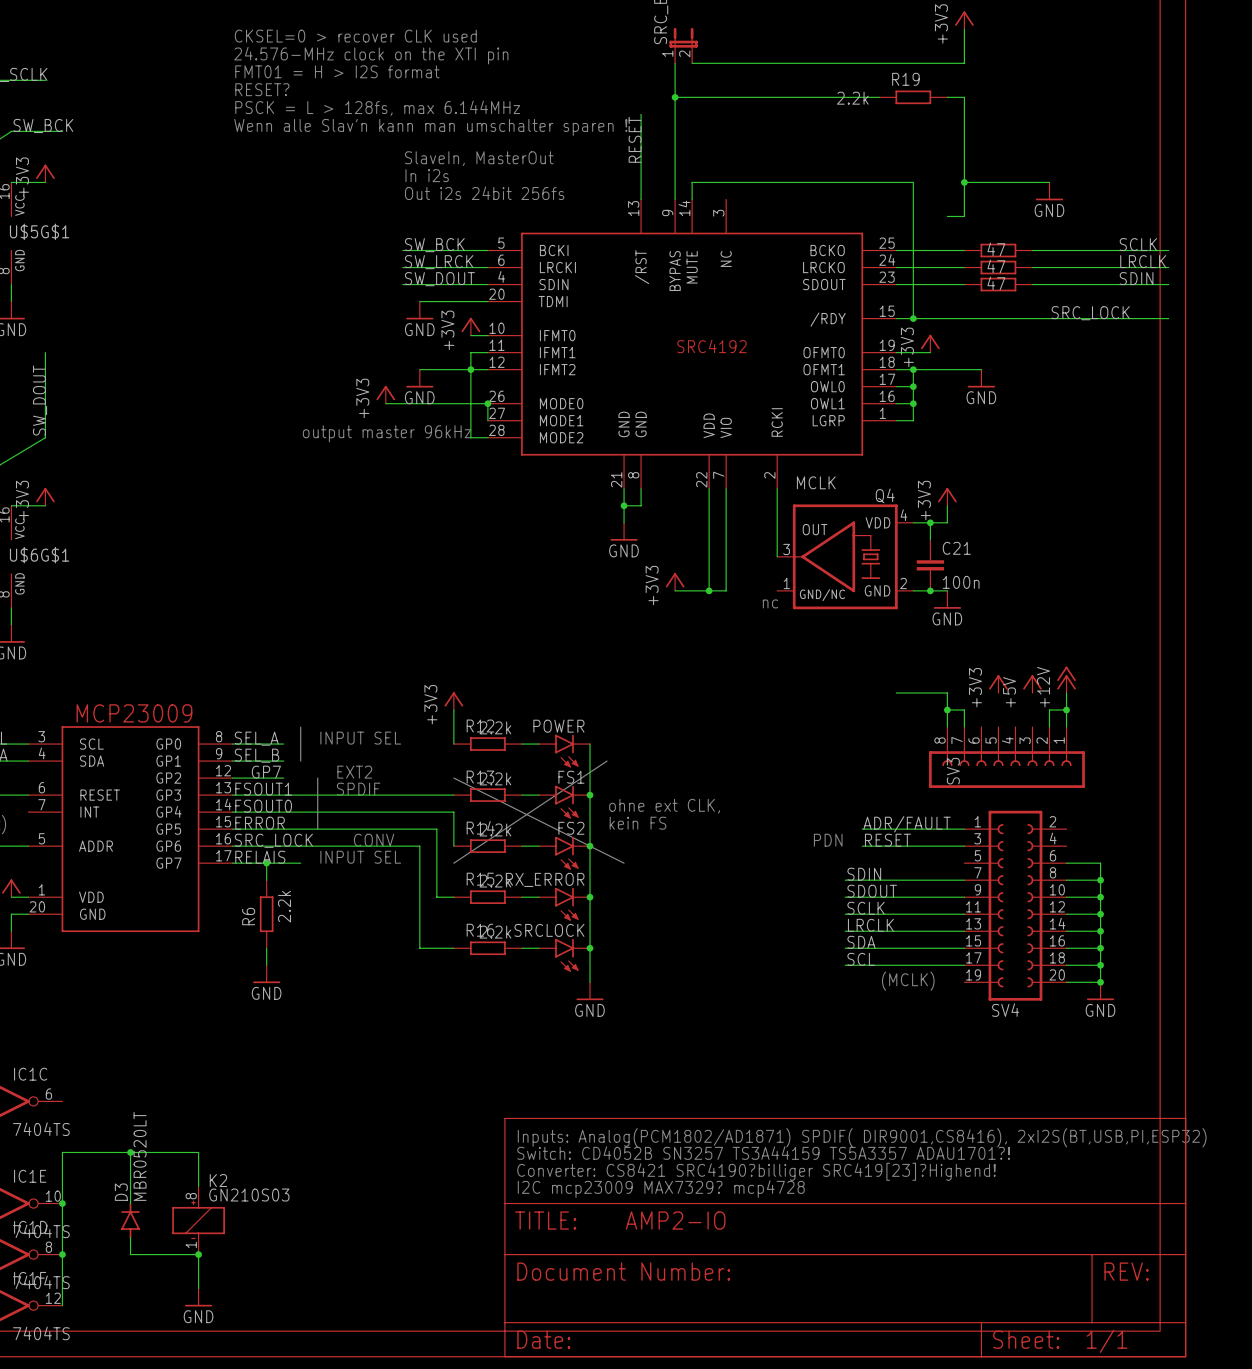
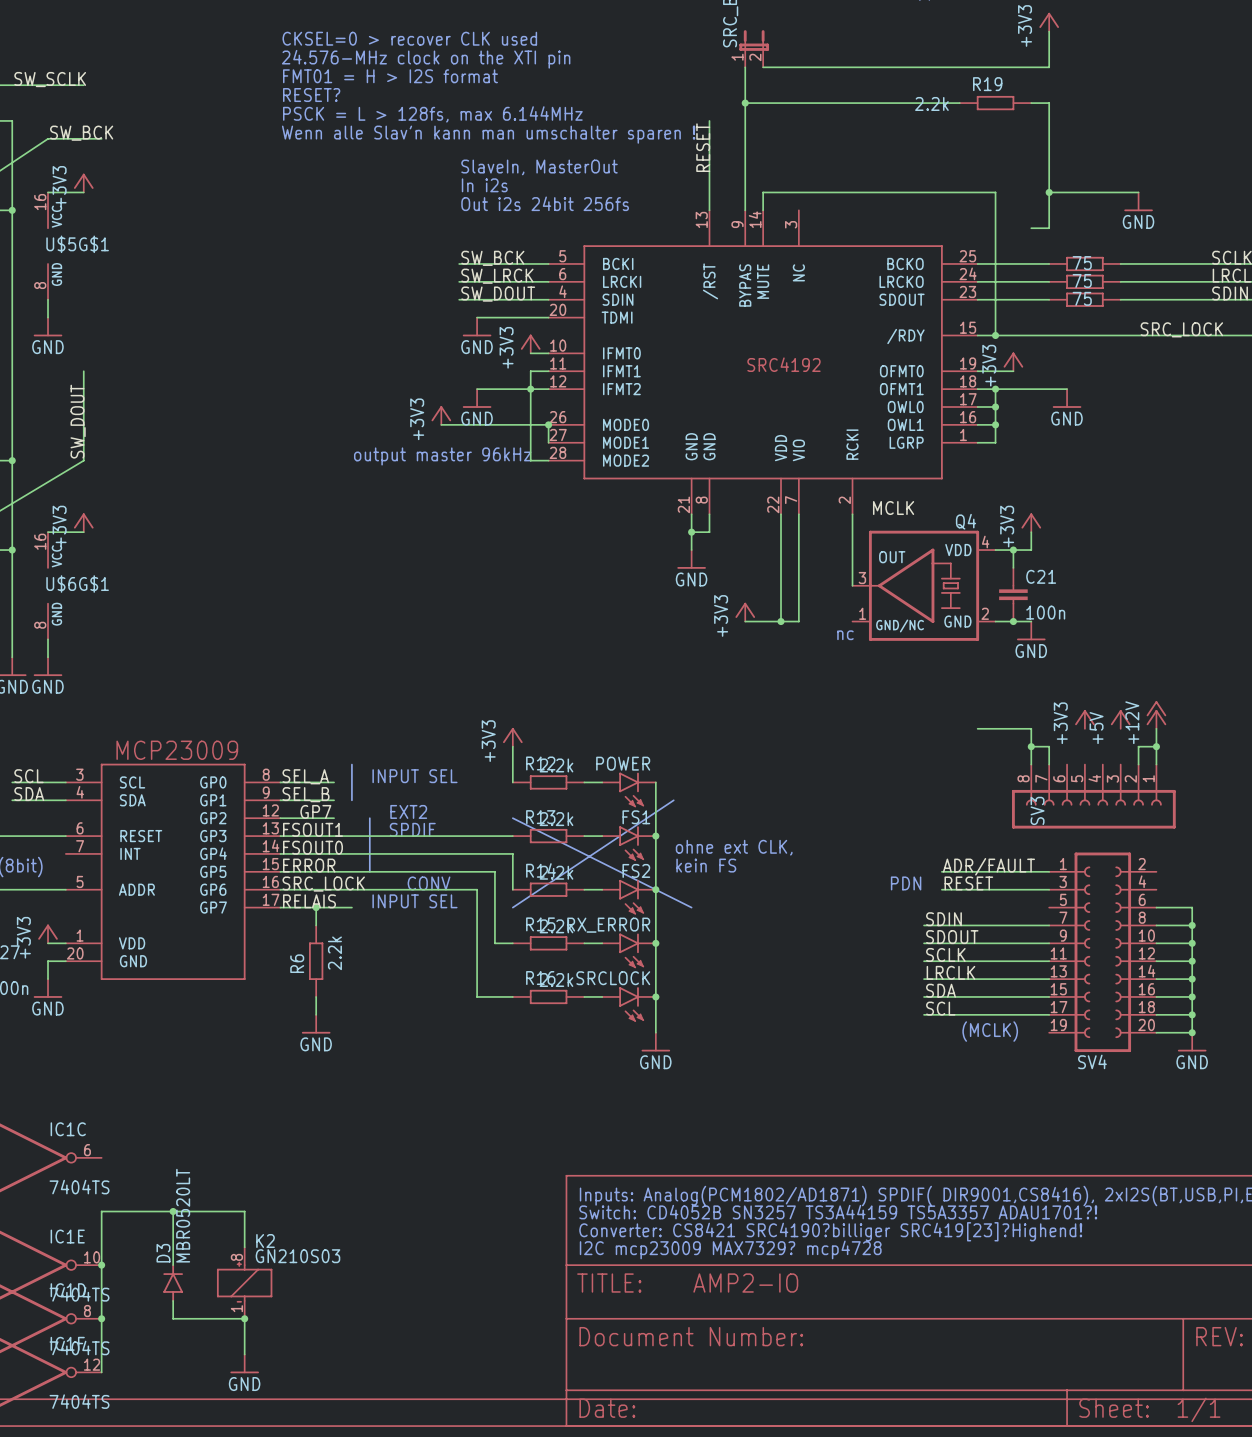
part value: 47 (996, 249) -> 75 (1082, 263)
part value: 47 (996, 266) -> 75 (1082, 280)
part value: 47 (996, 283) -> 75 (1082, 298)

